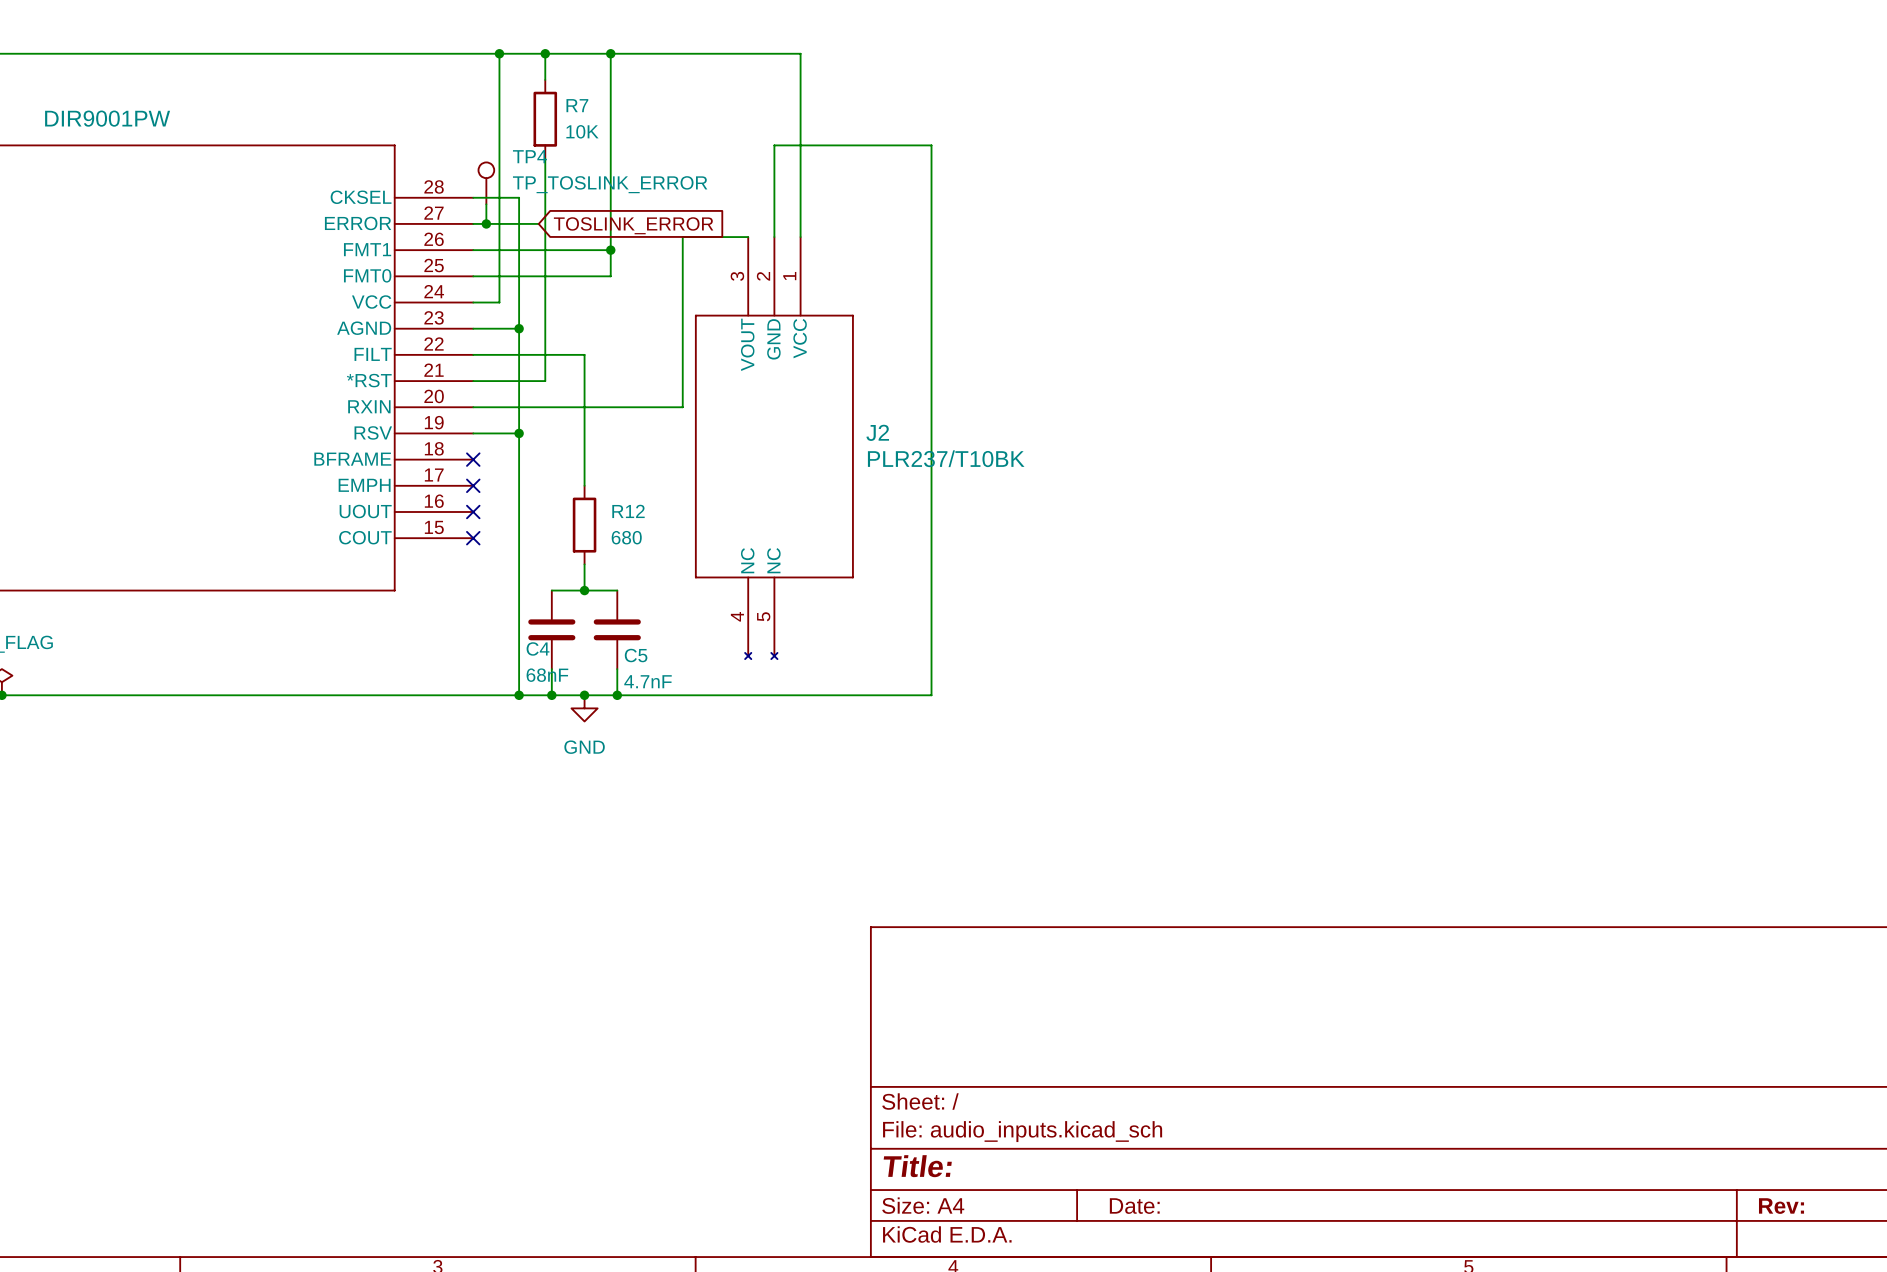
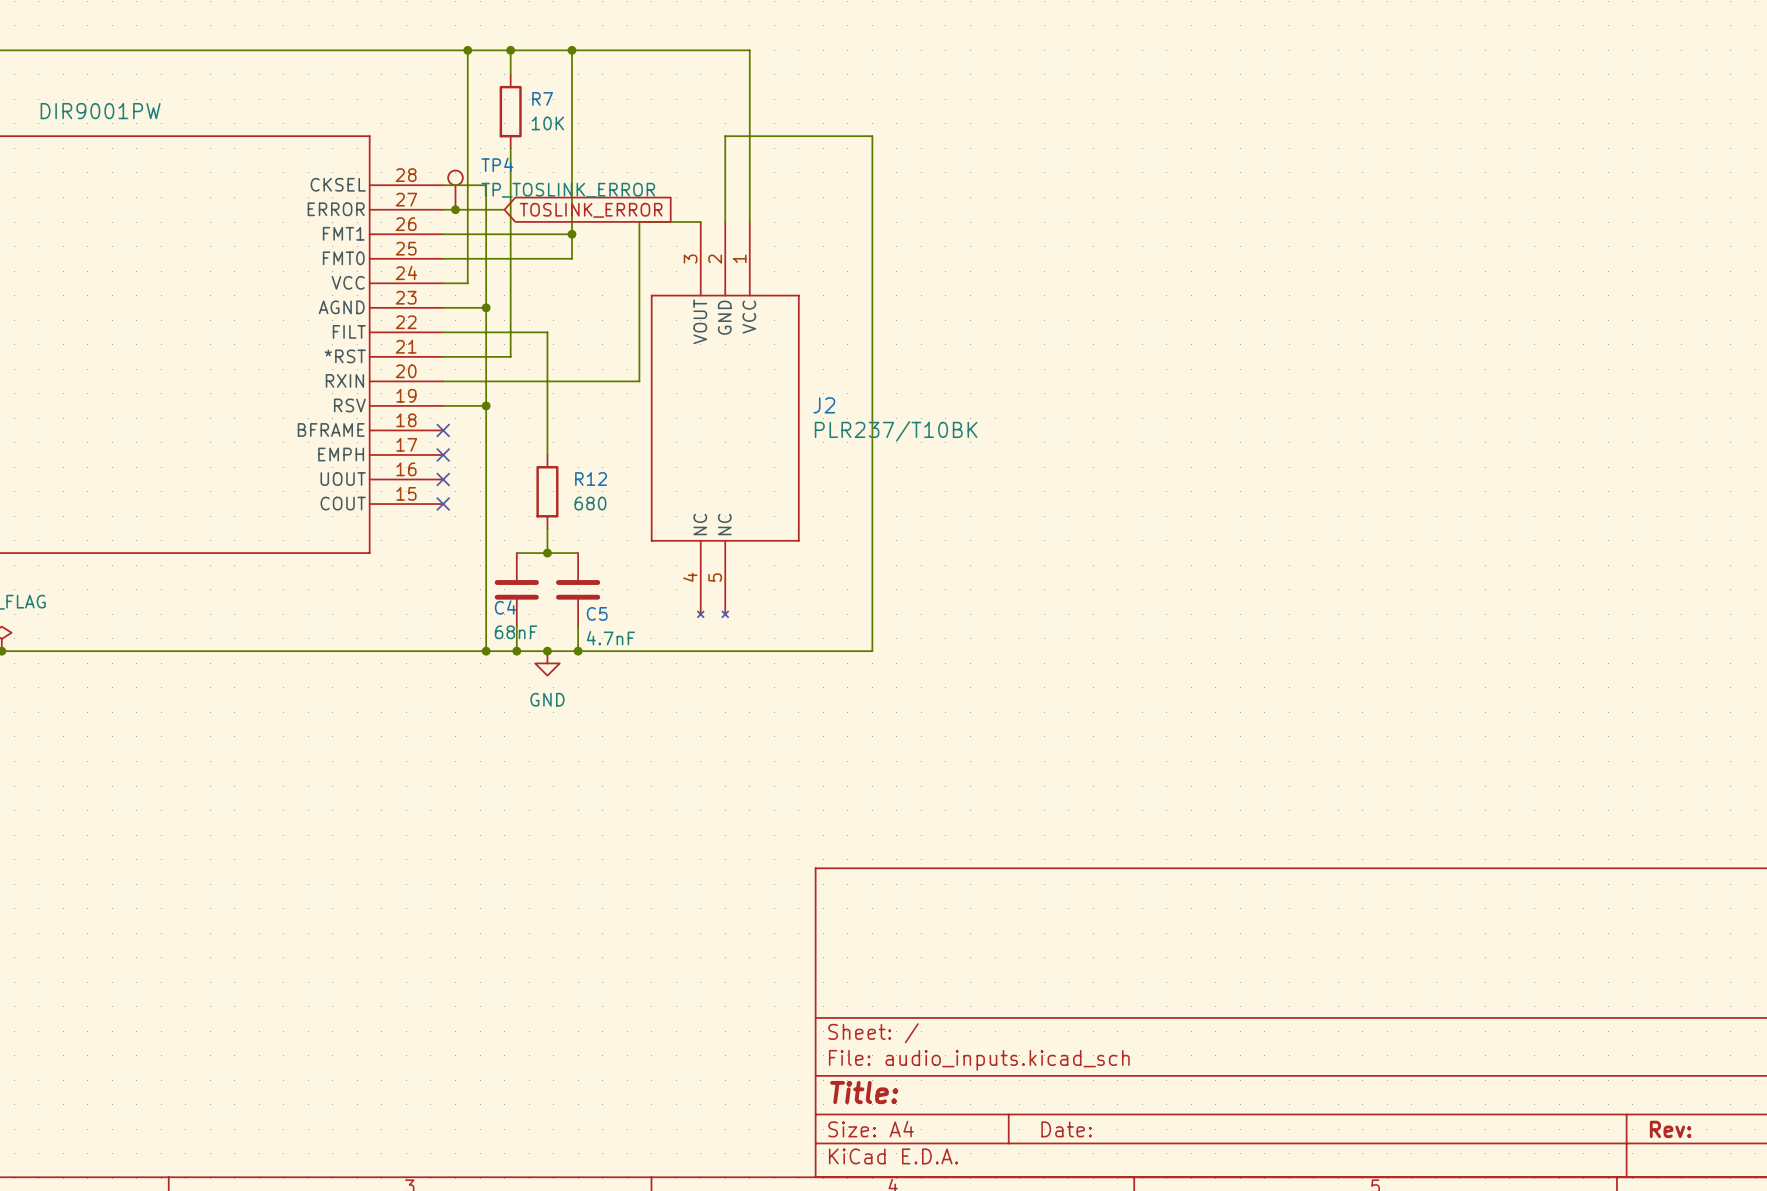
TP4 position: (486, 183) -> (455, 190)

